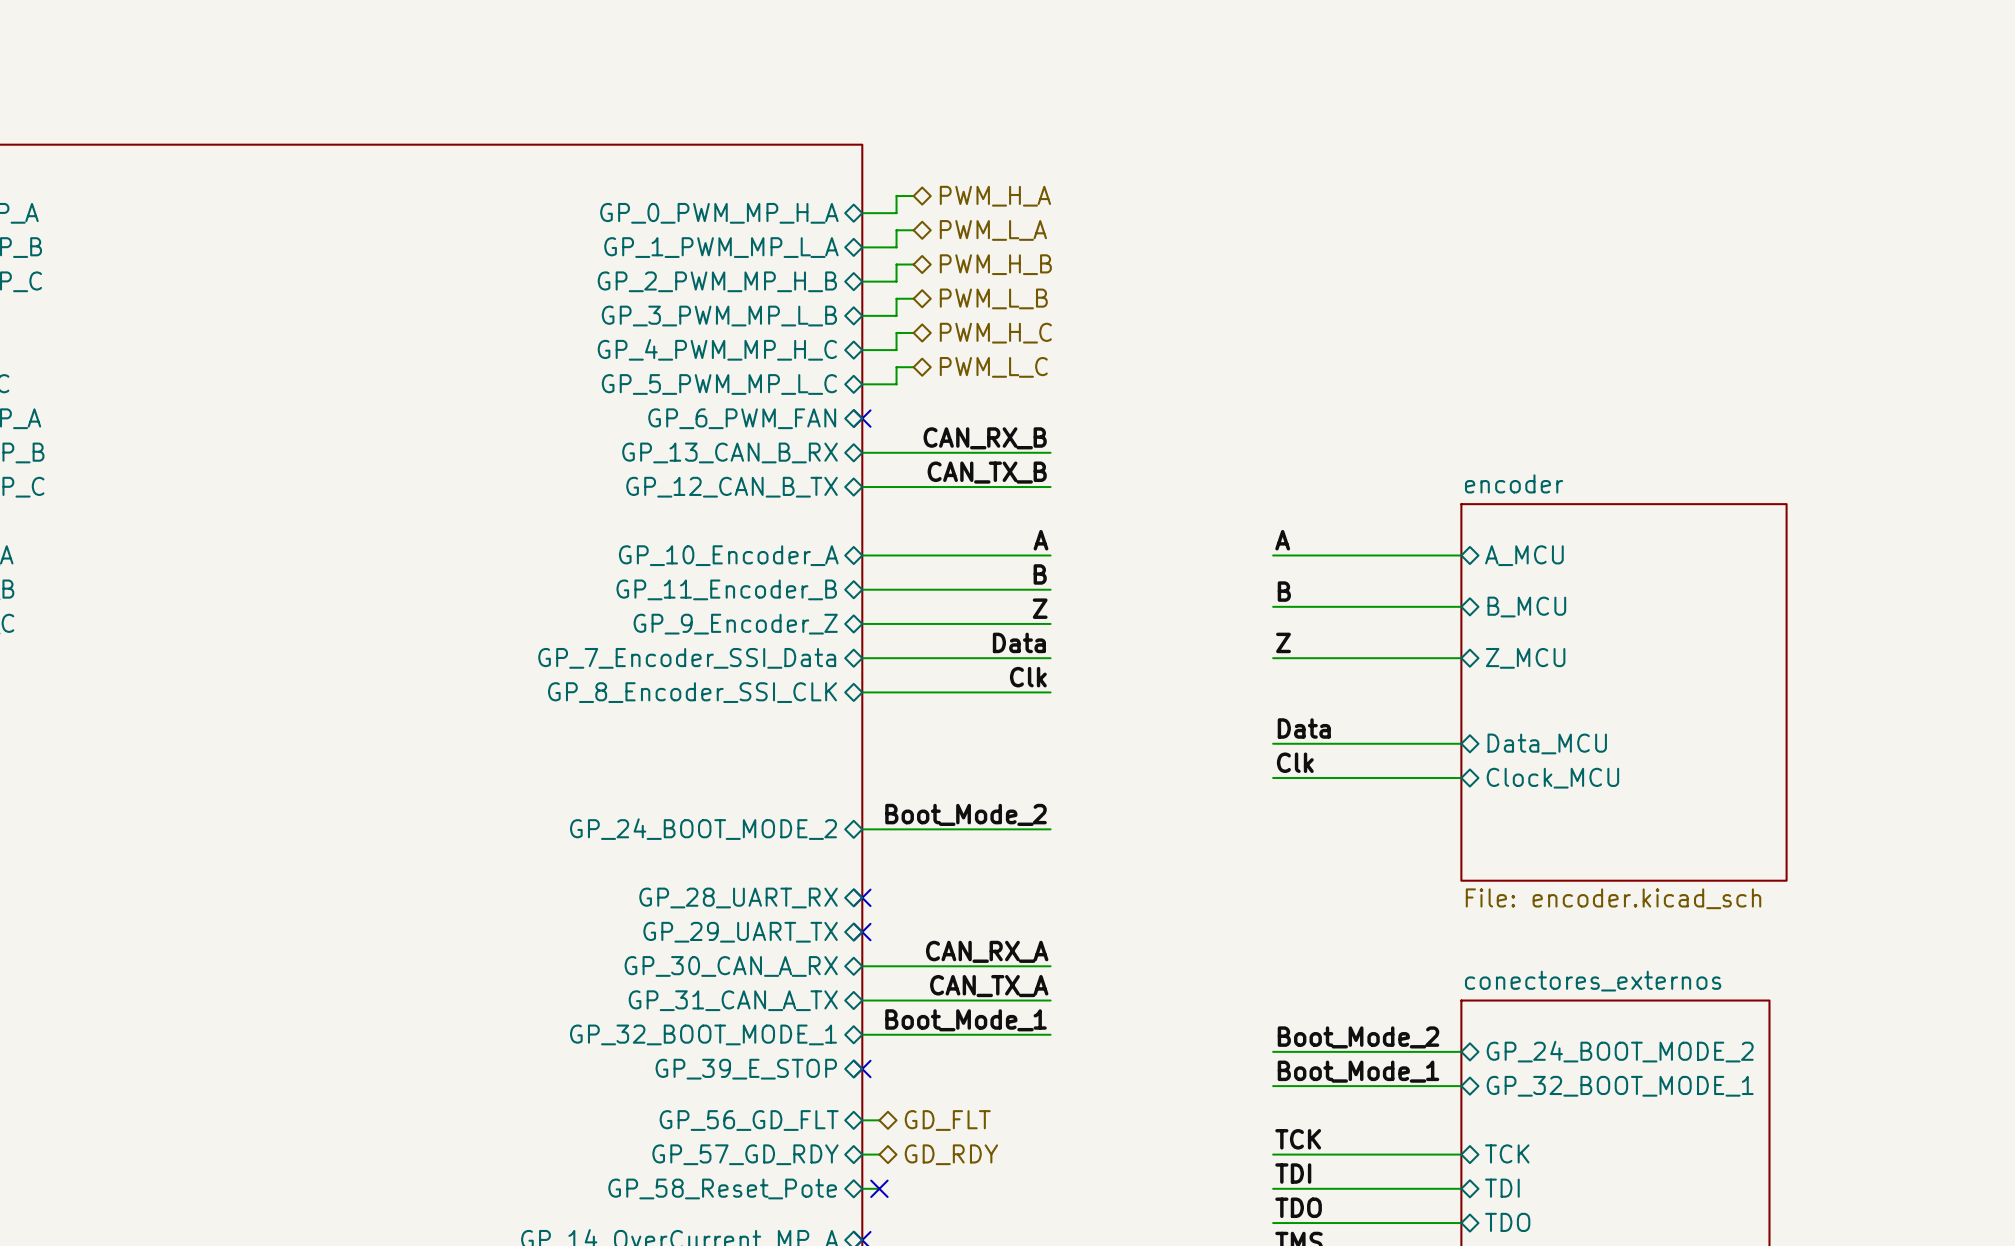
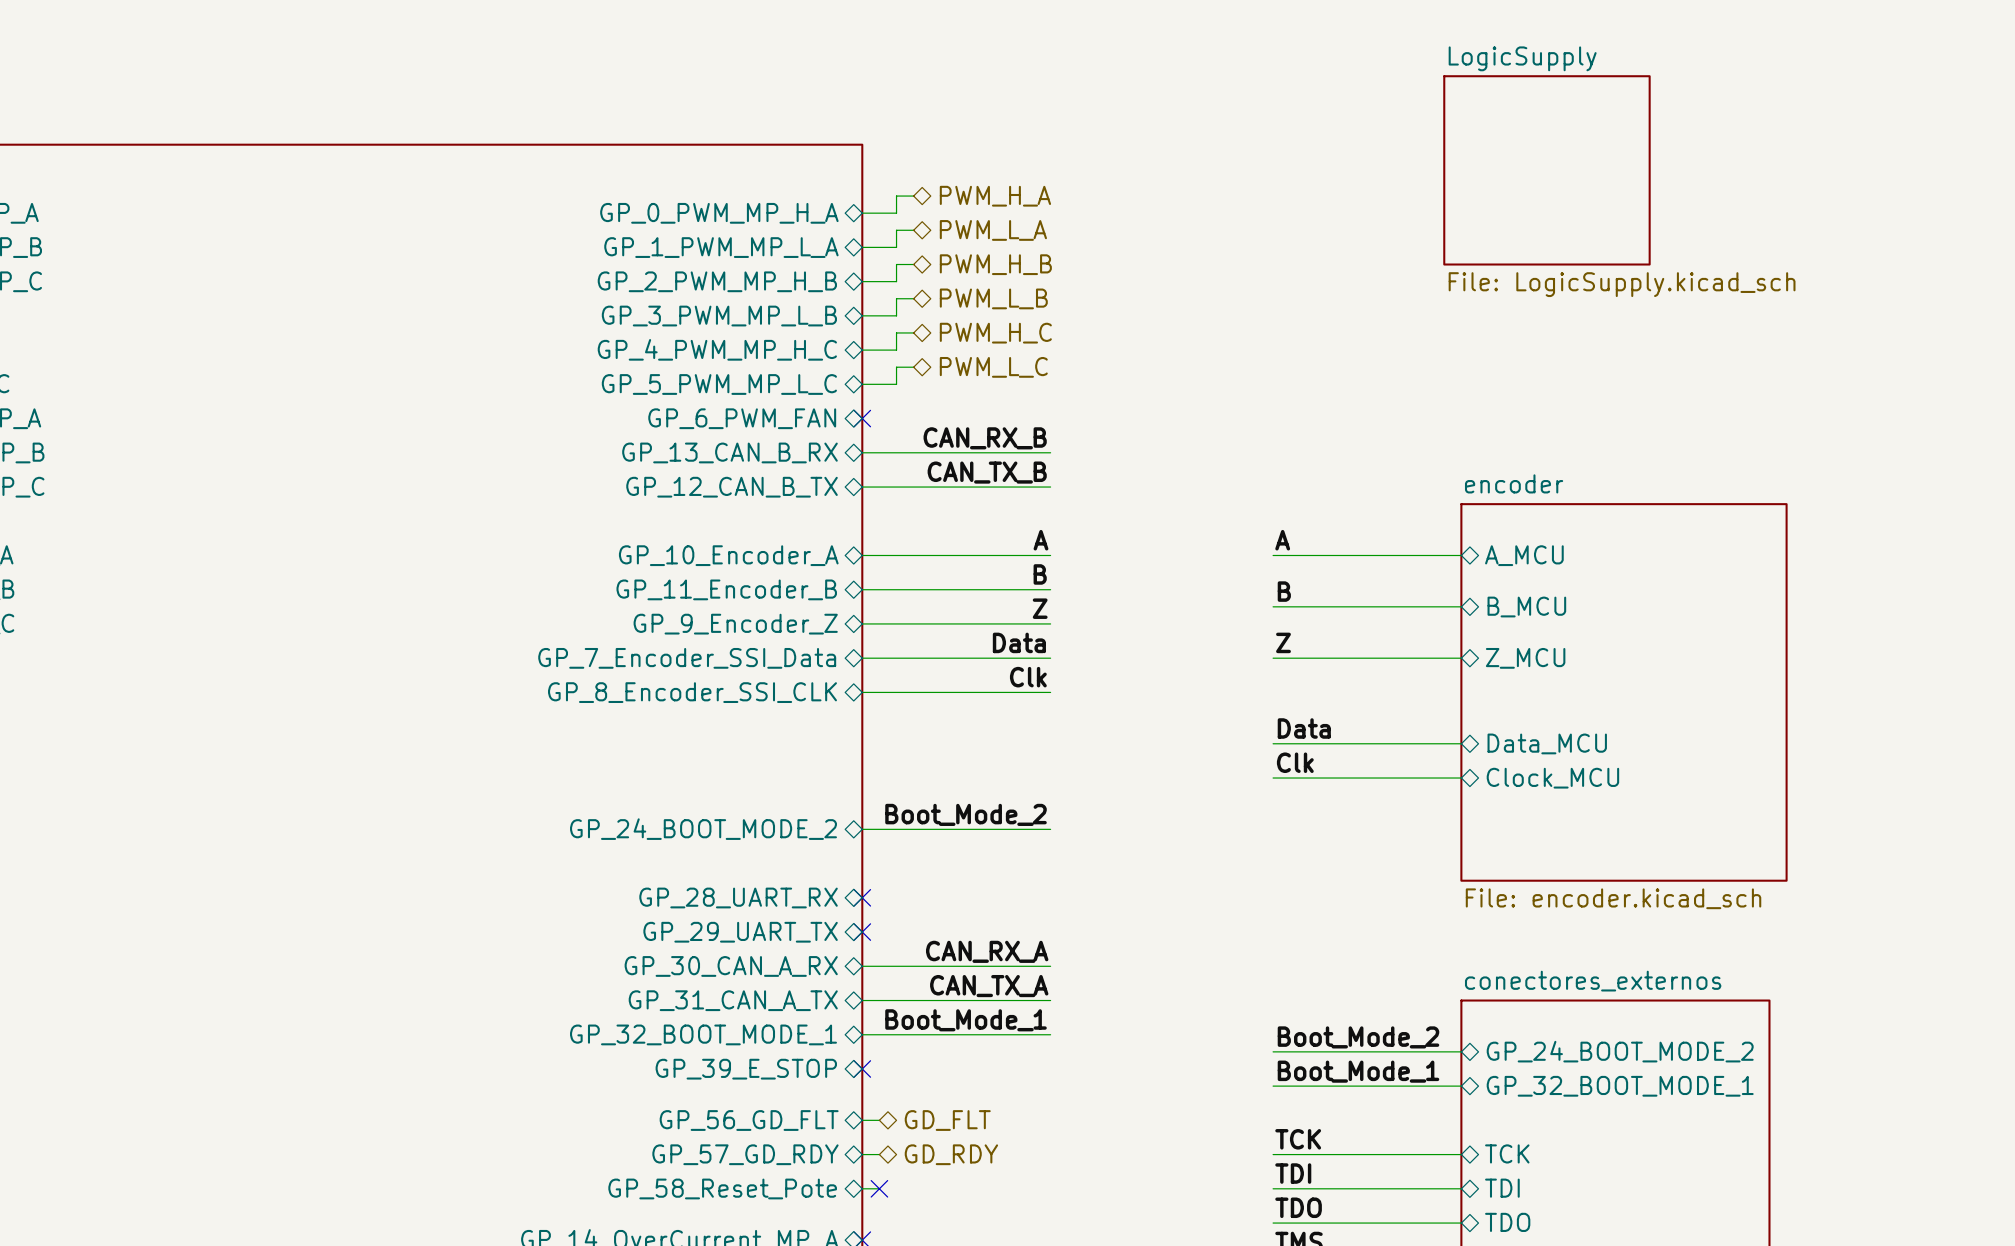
sheet LogicSupply: none -> File: LogicSupply.kicad_sch (1546, 170)

